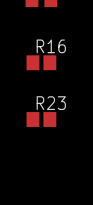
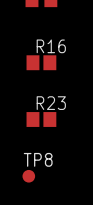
TP8: none -> (28, 176)

